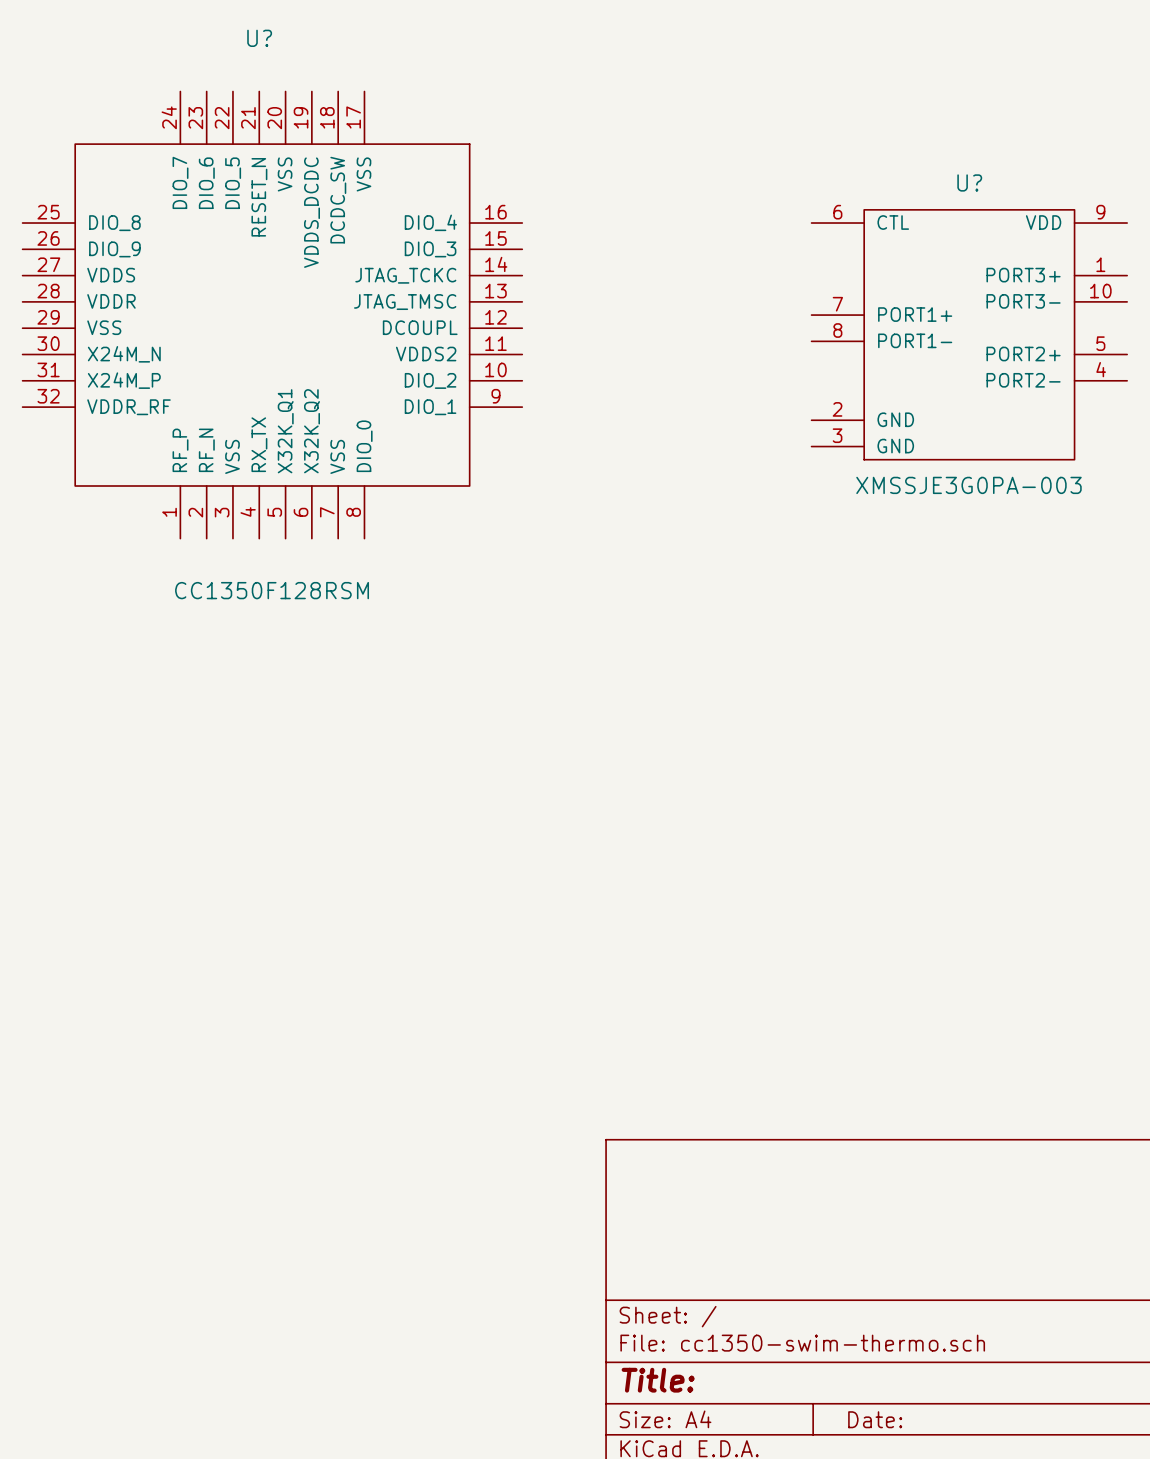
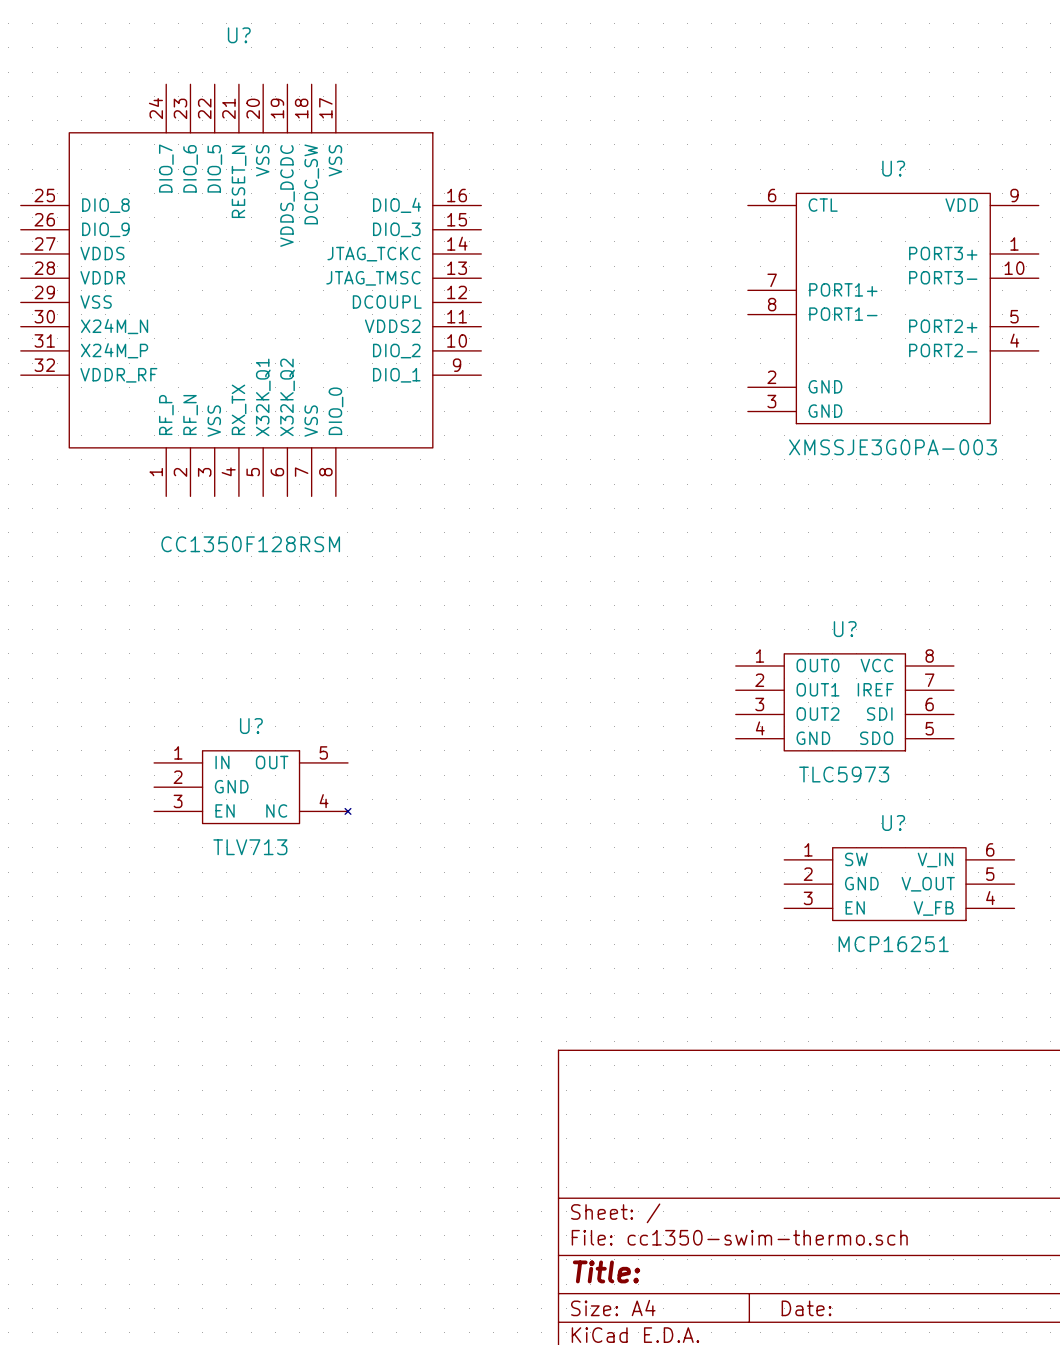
U?: none -> TLC5973 (844, 702)
U?: none -> TLV713 (252, 787)
U?: none -> MCP16251 (899, 884)

